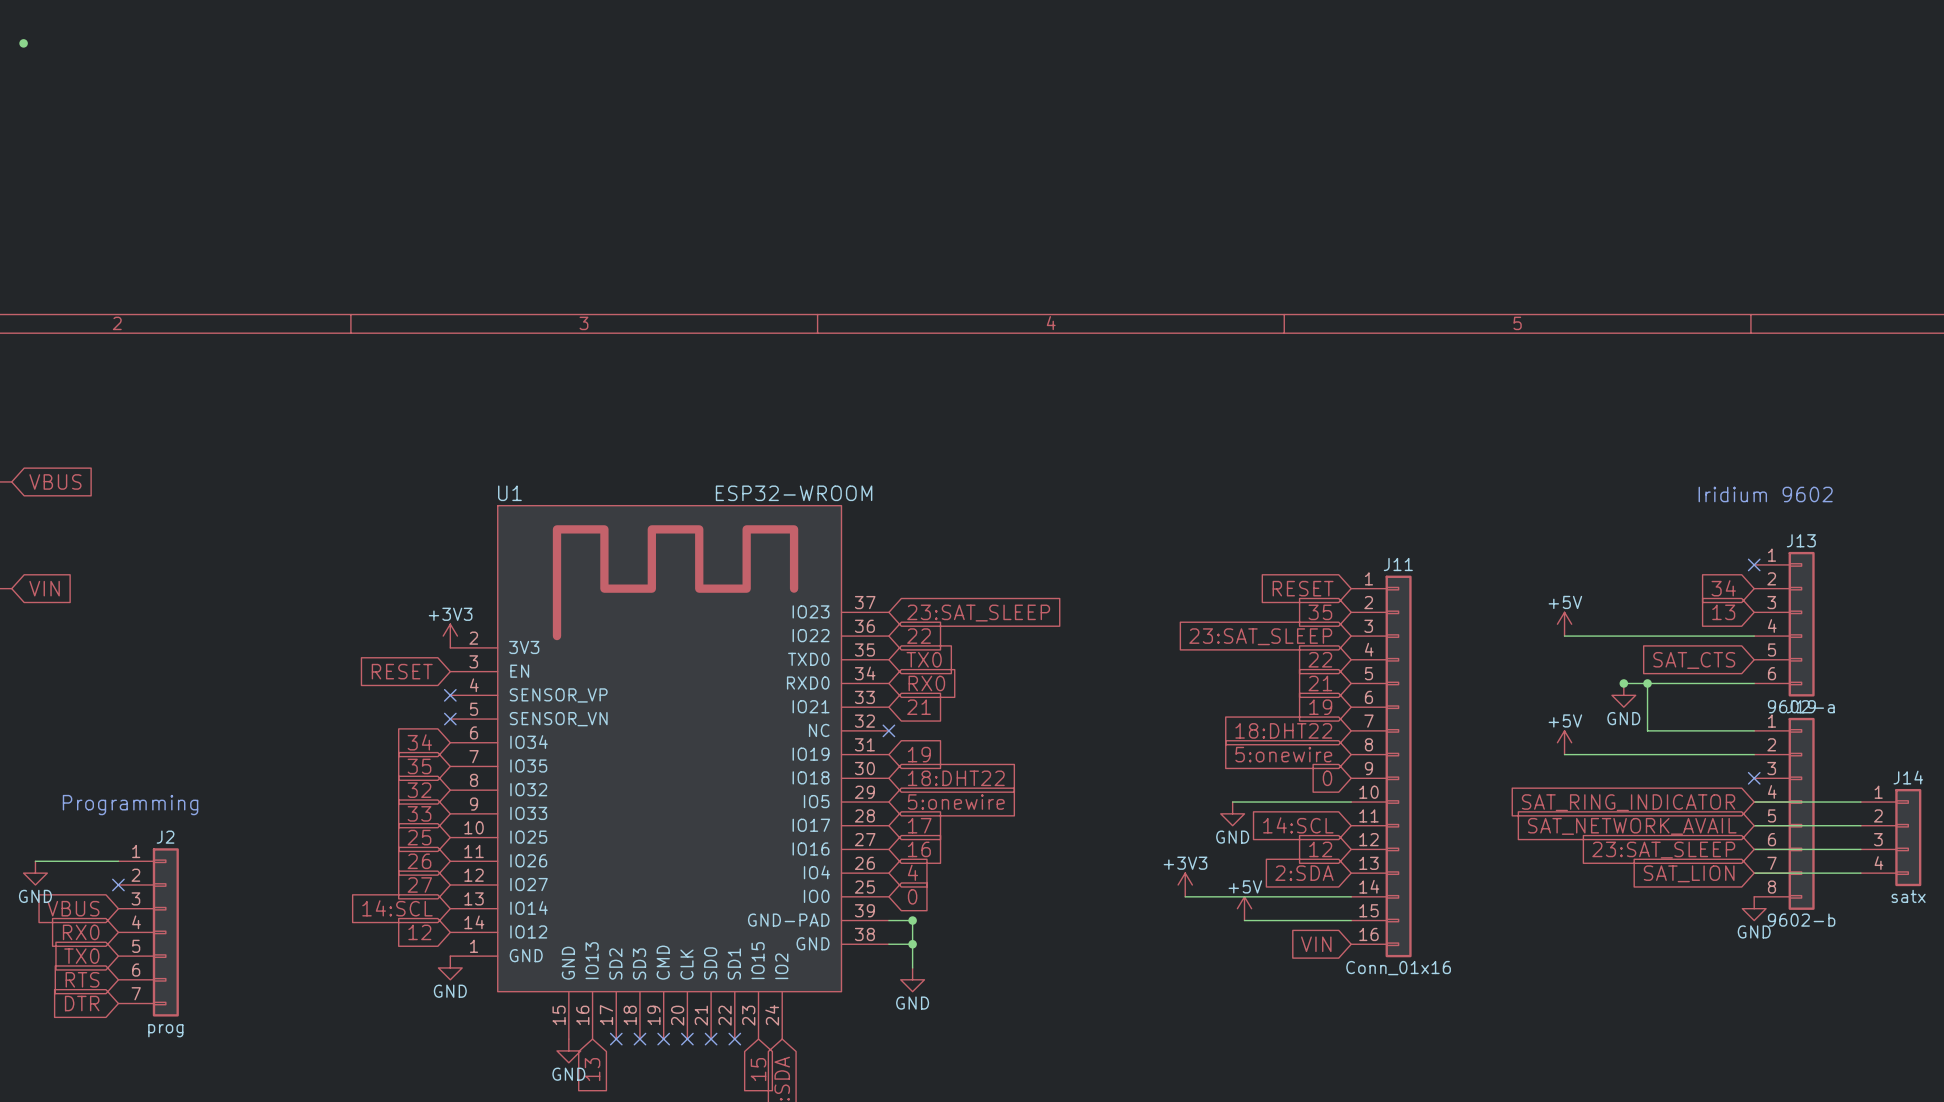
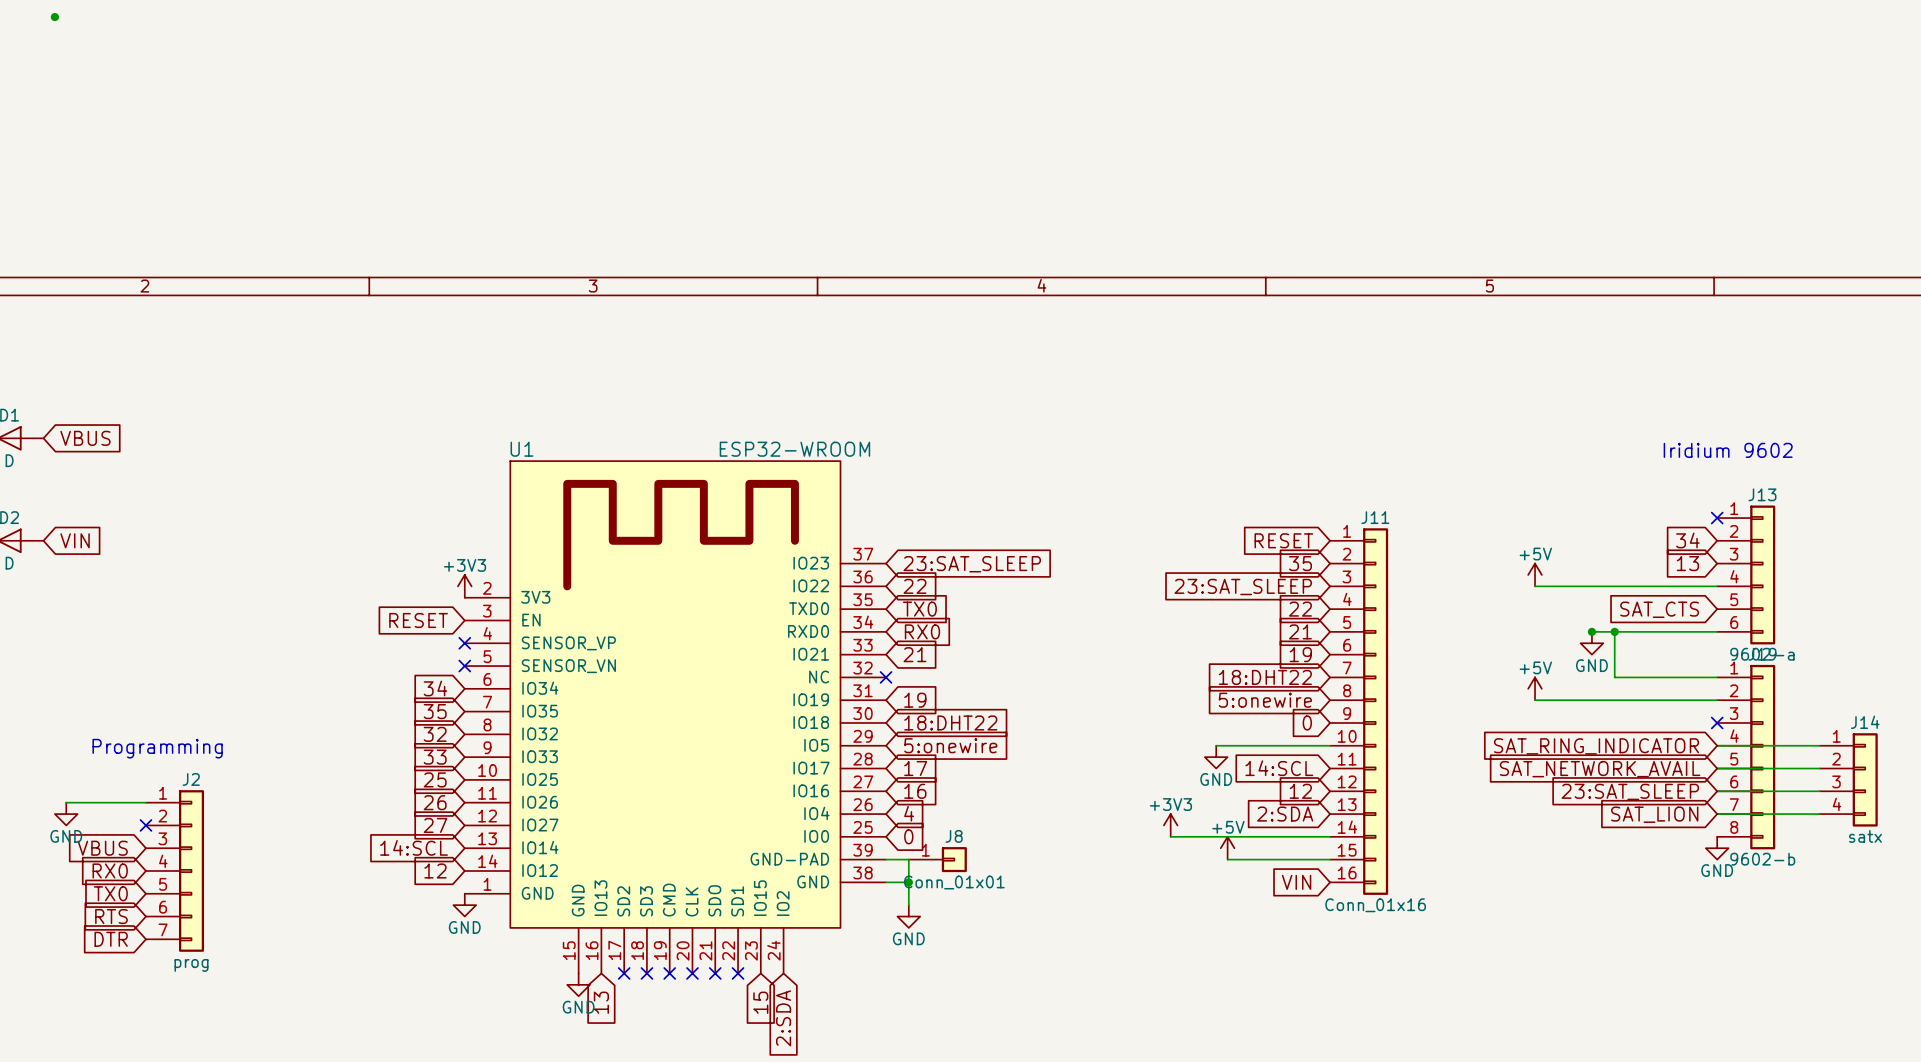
junction: (912, 920) -> none
J8: none -> Conn_01x01 (937, 859)

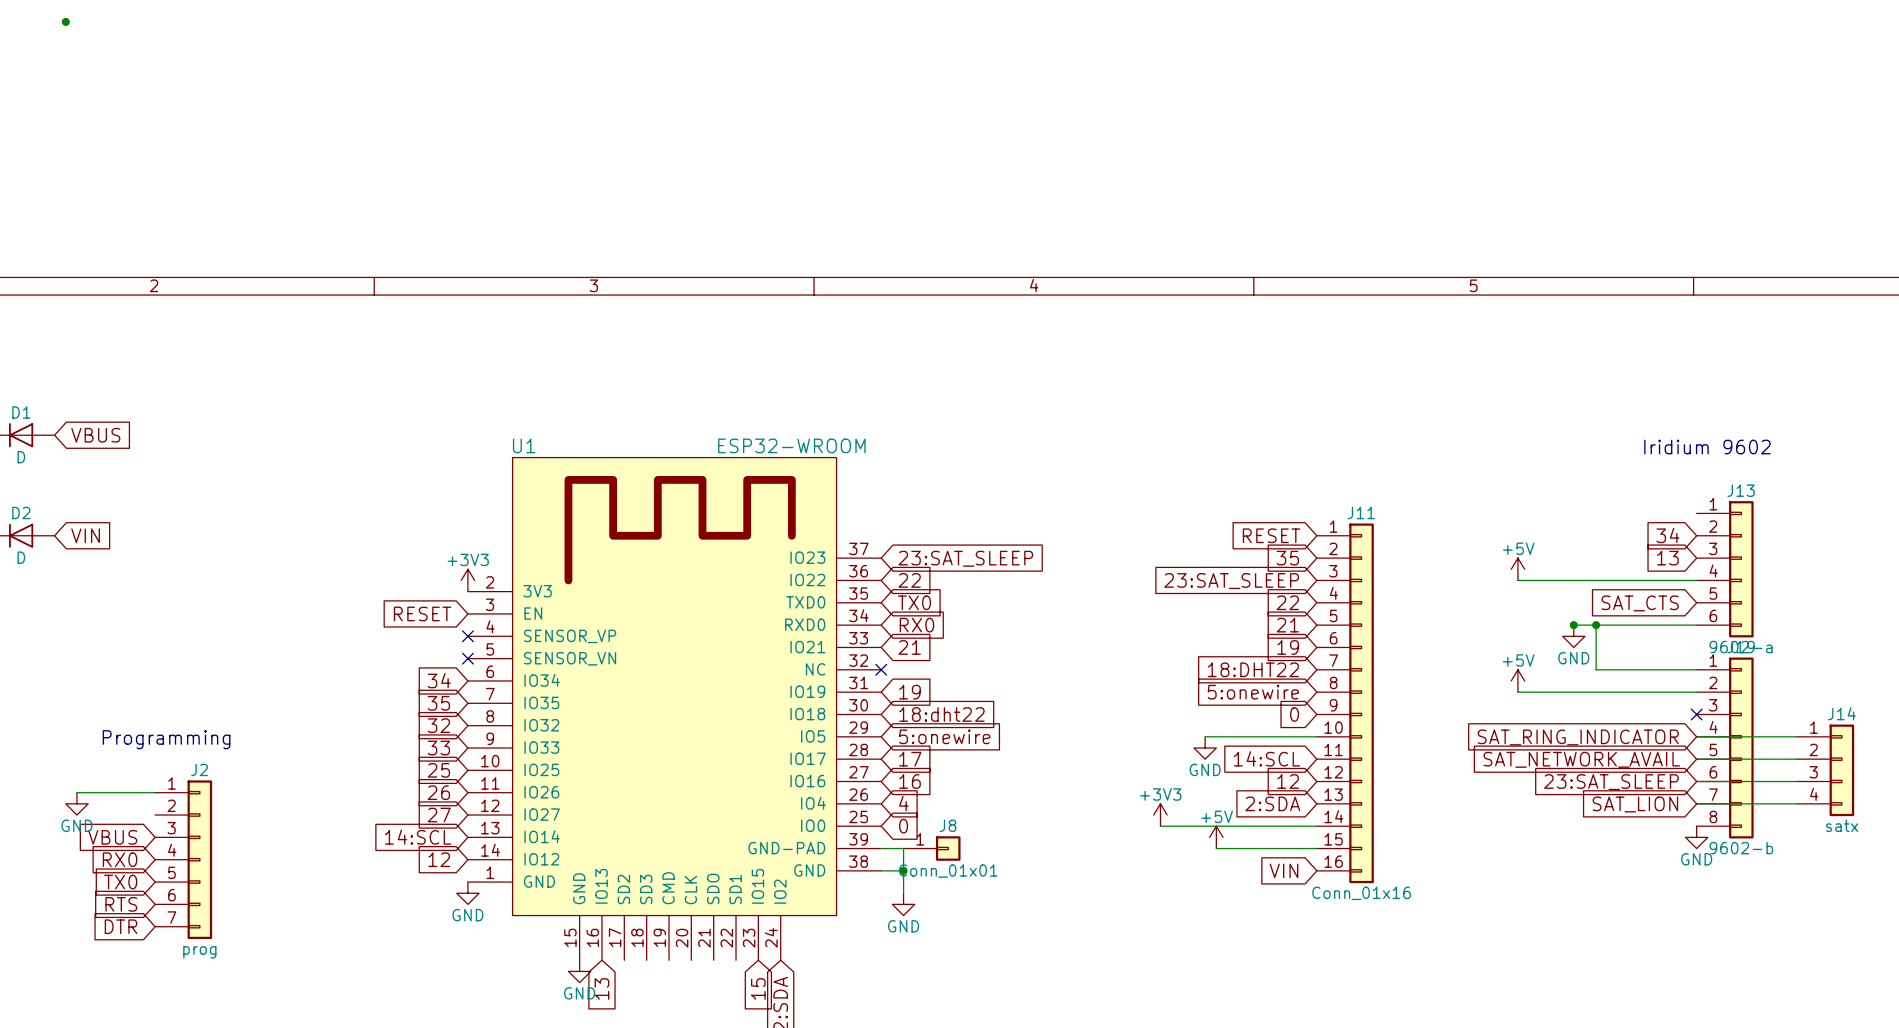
no-connect mark: (1717, 518) -> none
global label: 18:DHT22 (950, 722) -> 18:dht22 (941, 714)
no-connect mark: (145, 825) -> none
no-connect mark: (624, 973) -> none
no-connect mark: (646, 973) -> none
no-connect mark: (669, 973) -> none
no-connect mark: (692, 973) -> none
no-connect mark: (715, 973) -> none
no-connect mark: (738, 973) -> none

